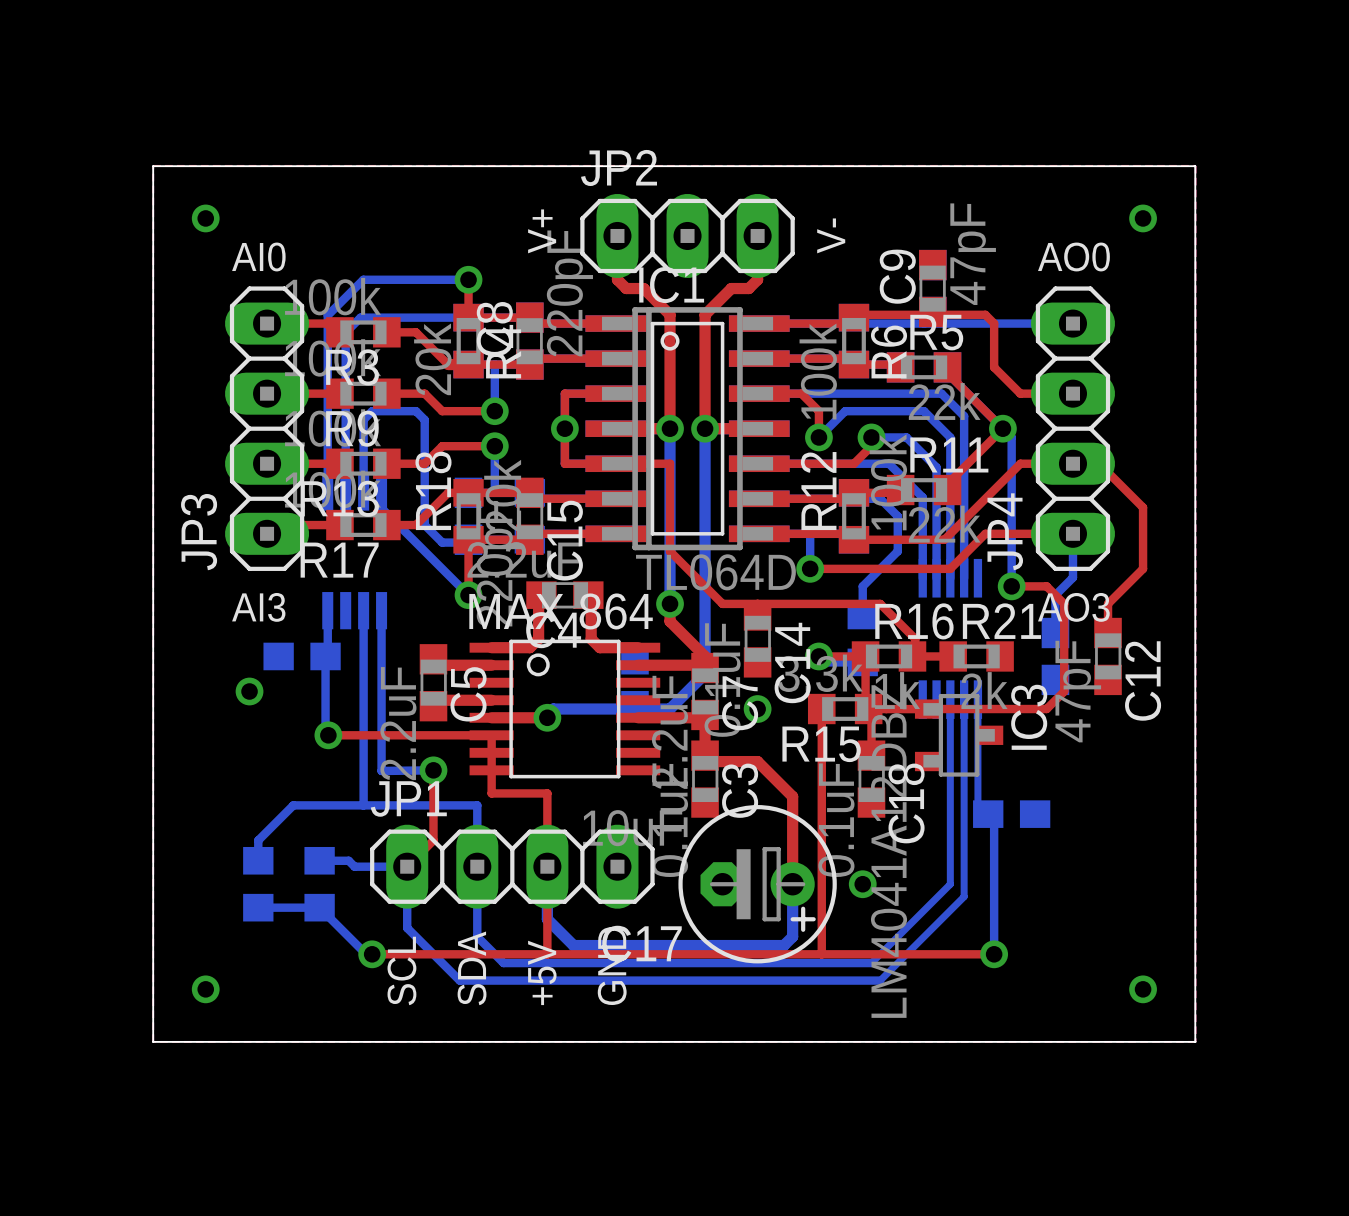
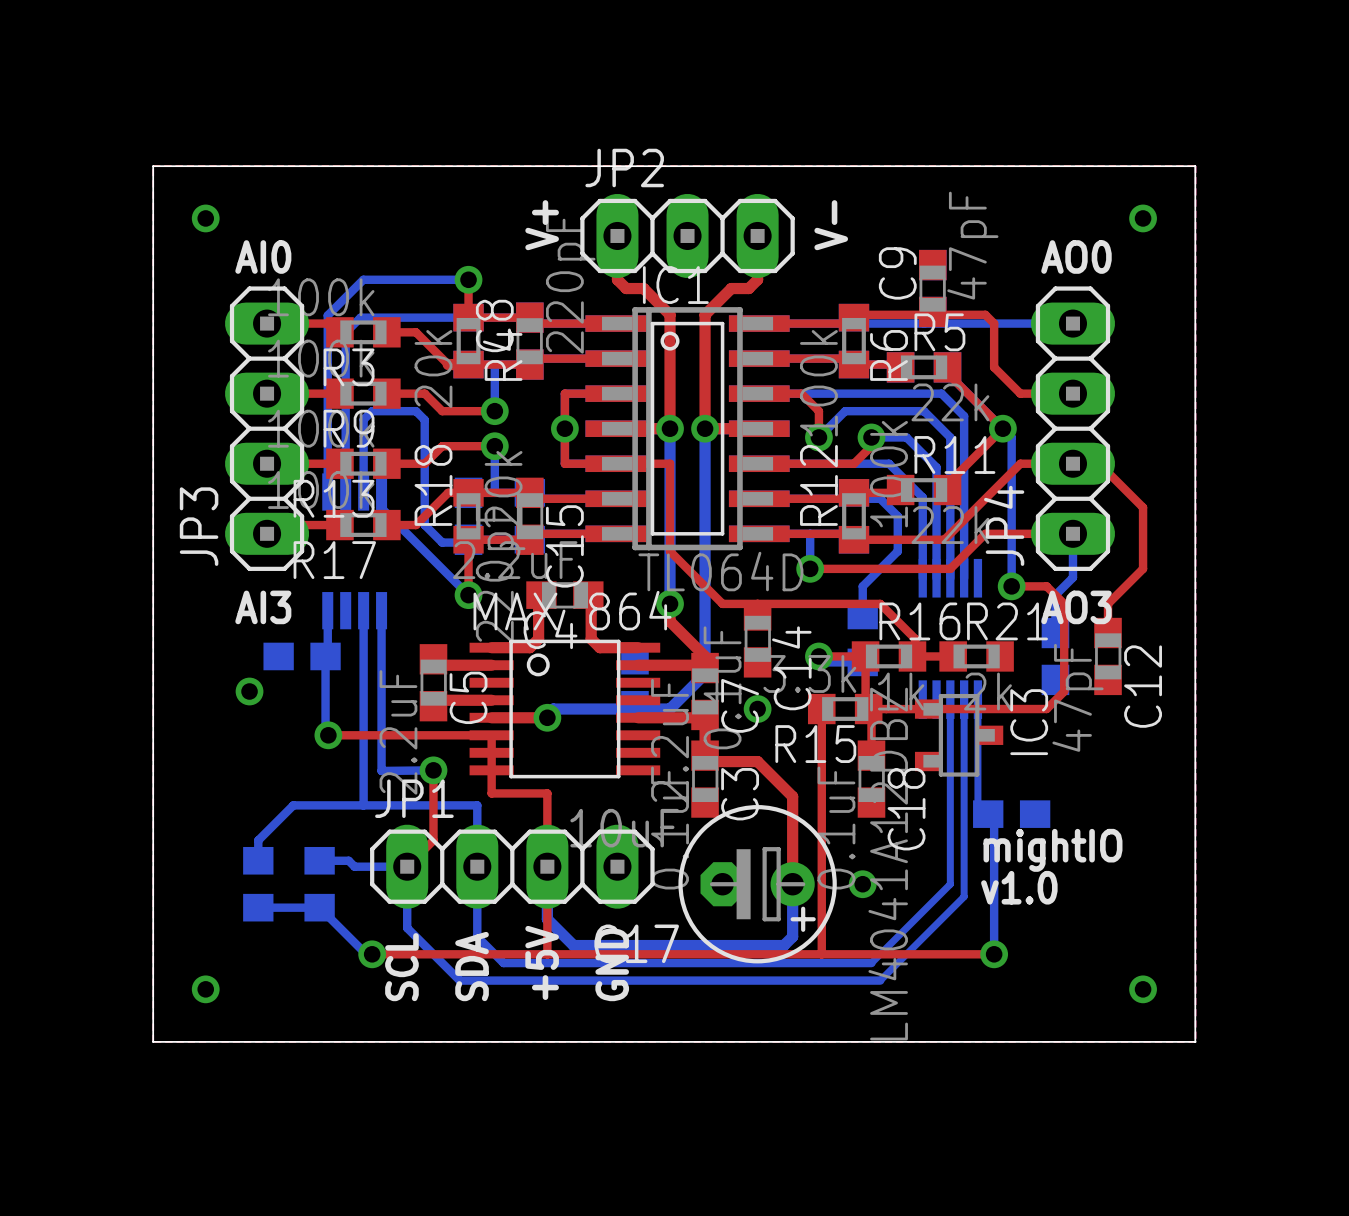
text: none -> mightIO (1052, 850)
text: none -> v1.0 (1019, 887)

